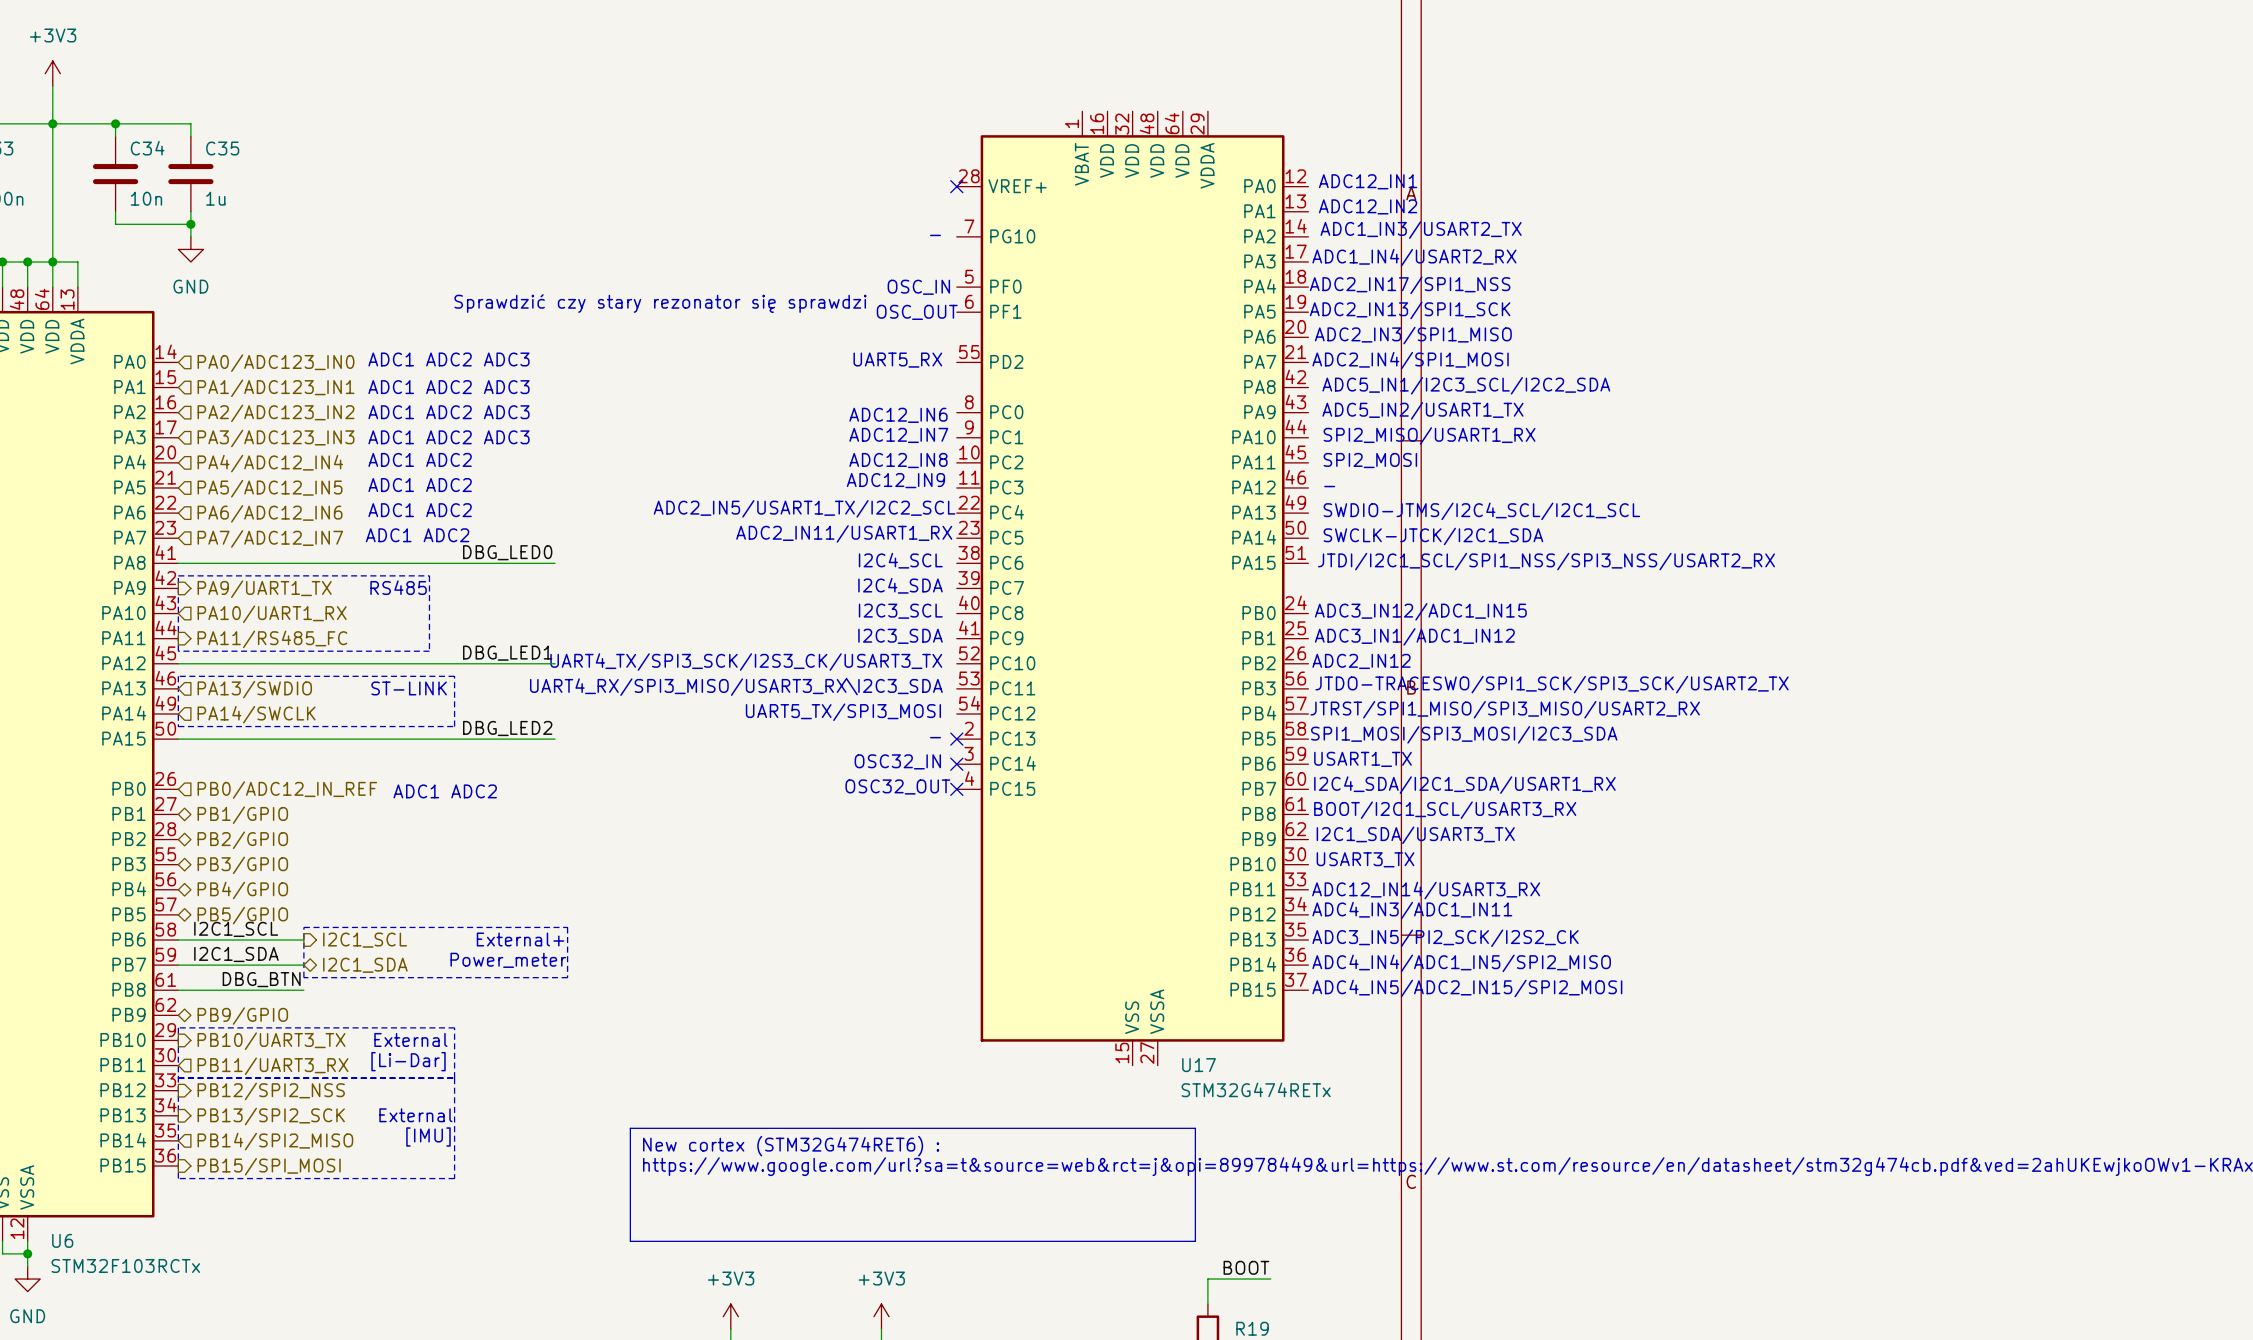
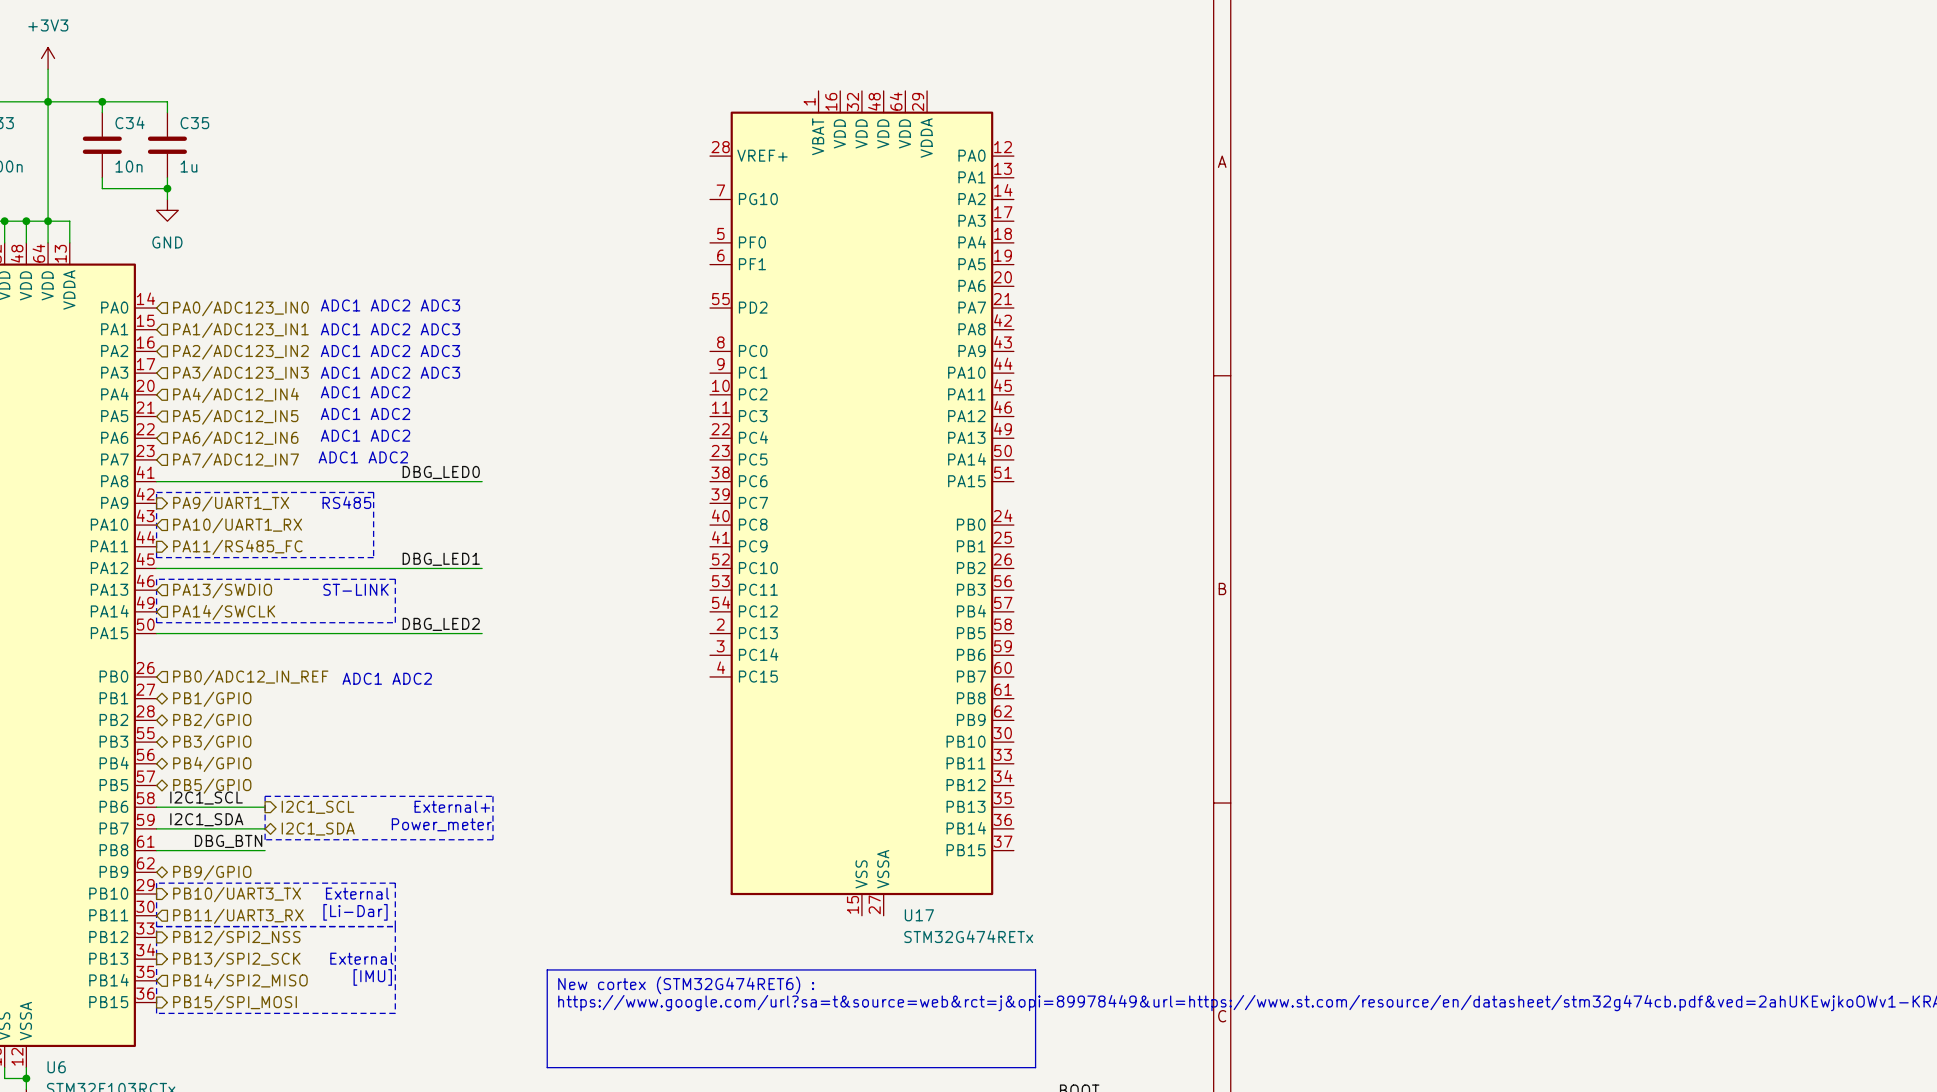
text: ADC12_IN1 (1368, 181) -> none
no-connect mark: (956, 186) -> none
text: ADC12_IN2 (1368, 206) -> none
text: ADC1_IN3/USART2_TX (1421, 230) -> none
text: - (935, 235) -> none
text: ADC1_IN4/USART2_RX (1414, 257) -> none
text: ADC2_IN17/SPI1_NSS (1410, 285) -> none
text: OSC_IN (918, 287) -> none
text: Sprawdzić czy stary rezonator się sprawdzi (660, 303) -> none
text: ADC2_IN13/SPI1_SCK (1410, 310) -> none
text: OSC_OUT (917, 312) -> none
text: ADC2_IN3/SPI1_MISO (1413, 335) -> none
text: UART5_RX (897, 360) -> none
text: ADC2_IN4/SPI1_MOSI (1410, 360) -> none
text: ADC5_IN1/I2C3_SCL/I2C2_SDA (1466, 385) -> none
text: ADC5_IN2/USART1_TX (1422, 410) -> none
text: ADC12_IN6 (898, 415) -> none
text: ADC12_IN7 (898, 435) -> none
text: SPI2_MISO/USART1_RX (1429, 436) -> none
text: ADC12_IN8 (898, 460) -> none
text: SPI2_MOSI (1370, 460) -> none
text: ADC12_IN9 (895, 480) -> none
text: - (1329, 486) -> none
text: ADC2_IN5/USART1_TX/I2C2_SCL (804, 508) -> none
text: SWDIO-JTMS/I2C4_SCL/I2C1_SCL (1481, 511) -> none
text: ADC2_IN11/USART1_RX (844, 533) -> none
text: SWCLK-JTCK/I2C1_SDA (1433, 536) -> none
text: I2C4_SCL (900, 560) -> none
text: JTDI/I2C1_SCL/SPI1_NSS/SPI3_NSS/USART2_RX (1546, 561) -> none
text: I2C4_SDA (900, 585) -> none
U17 position: (1132, 588) -> (861, 503)
text: I2C3_SCL (900, 611) -> none
text: ADC3_IN12/ADC1_IN15 (1420, 611) -> none
text: I2C3_SDA (900, 636) -> none
text: ADC3_IN1/ADC1_IN12 (1414, 636) -> none
text: ADC2_IN12 (1361, 661) -> none
text: UART4_TX/SPI3_SCK/I2S3_CK/USART3_TX (746, 662) -> none
text: JTDO-TRACESWO/SPI1_SCK/SPI3_SCK/USART2_TX (1552, 684) -> none
text: UART4_RX/SPI3_MISO/USART3_RX\I2C3_SDA (736, 686) -> none
text: JTRST/SPI1_MISO/SPI3_MISO/USART2_RX (1505, 709) -> none
text: UART5_TX/SPI3_MOSI (843, 712) -> none
text: SPI1_MOSI/SPI3_MOSI/I2C3_SDA (1464, 734) -> none
text: - (935, 737) -> none
no-connect mark: (956, 739) -> none
text: USART1_TX (1363, 759) -> none
text: OSC32_IN (897, 761) -> none
no-connect mark: (956, 764) -> none
text: I2C4_SDA/I2C1_SDA/USART1_RX (1464, 785) -> none
text: OSC32_OUT (897, 786) -> none
no-connect mark: (956, 789) -> none
text: BOOT/I2C1_SCL/USART3_RX (1445, 810) -> none
text: I2C1_SDA/USART3_TX (1415, 835) -> none
text: USART3_TX (1365, 859) -> none
text: ADC12_IN14/USART3_RX (1426, 890) -> none
text: ADC4_IN3/ADC1_IN11 (1412, 910) -> none
text: ADC3_IN5/PI2_SCK/I2S2_CK (1445, 938) -> none
text: ADC4_IN4/ADC1_IN5/SPI2_MISO (1461, 963) -> none
text: ADC4_IN5/ADC2_IN15/SPI2_MOSI (1467, 988) -> none

